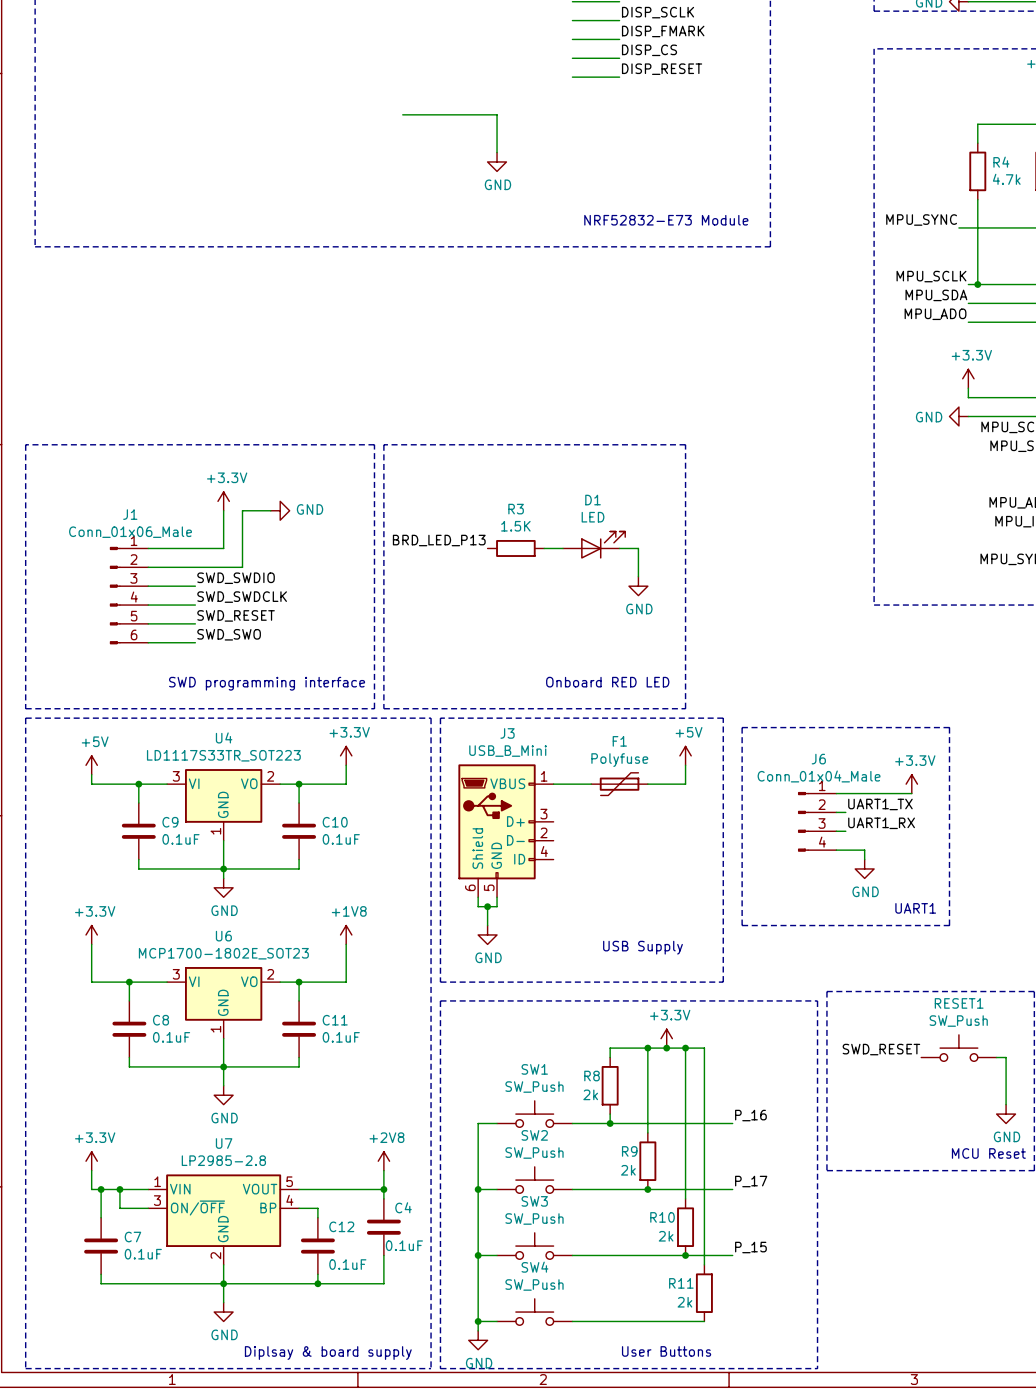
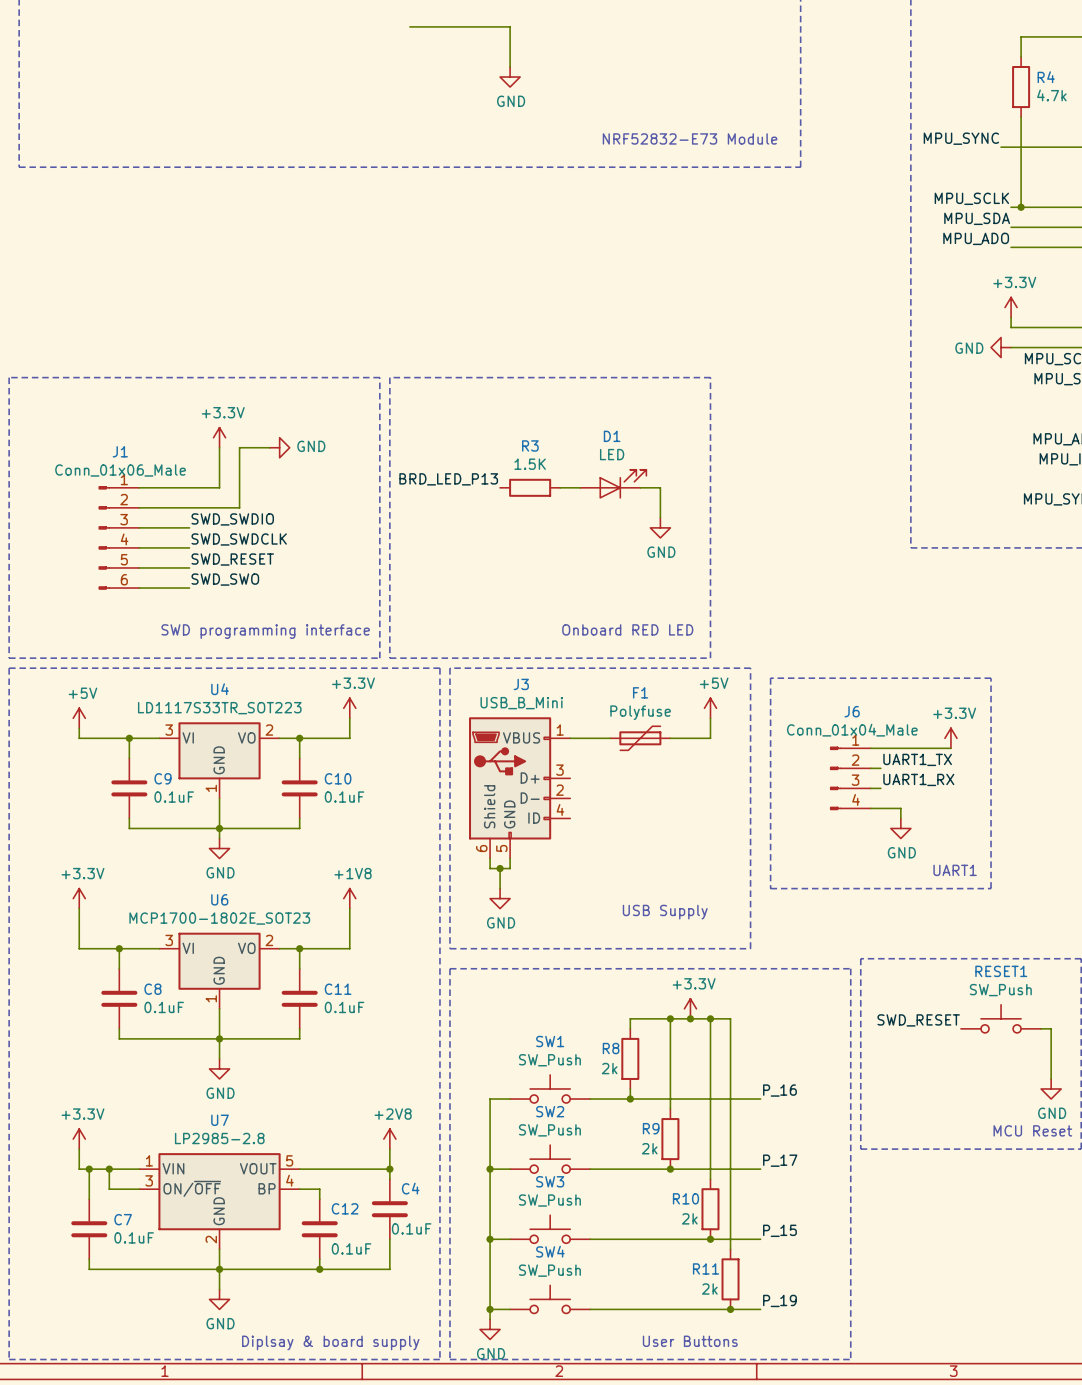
label: none -> P_19 (779, 1300)
wire: none -> (730, 1309) (760, 1309)
junction: none -> (730, 1309)

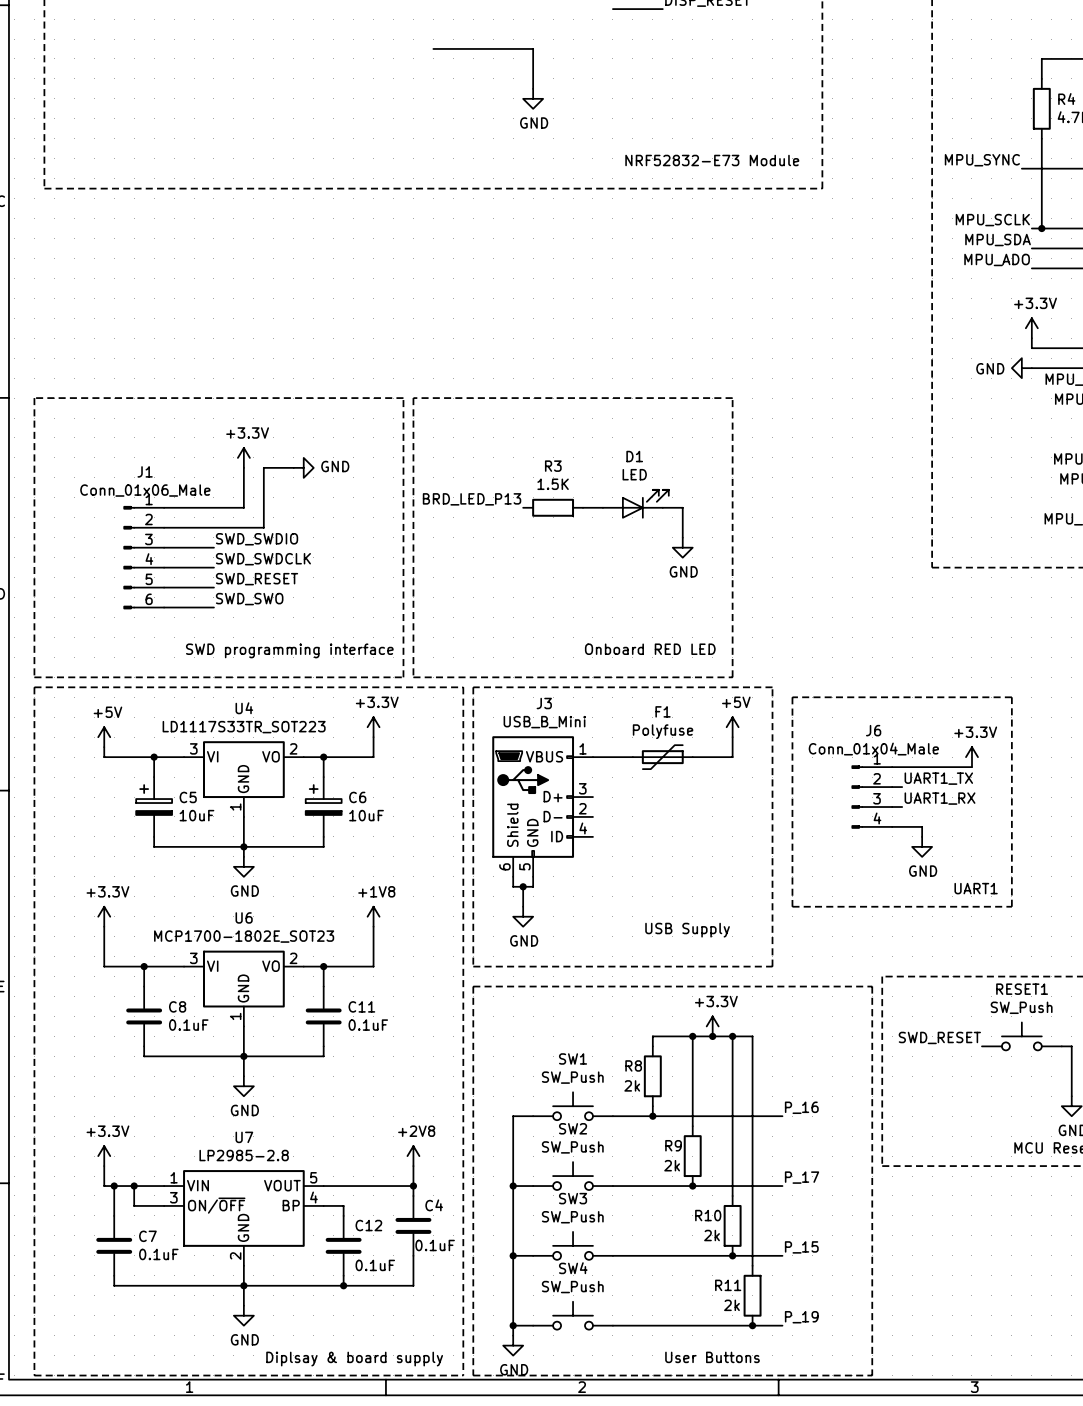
C9: 0.1uF (129, 788) -> none
C5: none -> 10uF (154, 807)
C10: 0.1uF (299, 788) -> none
C6: none -> 10uF (323, 807)

